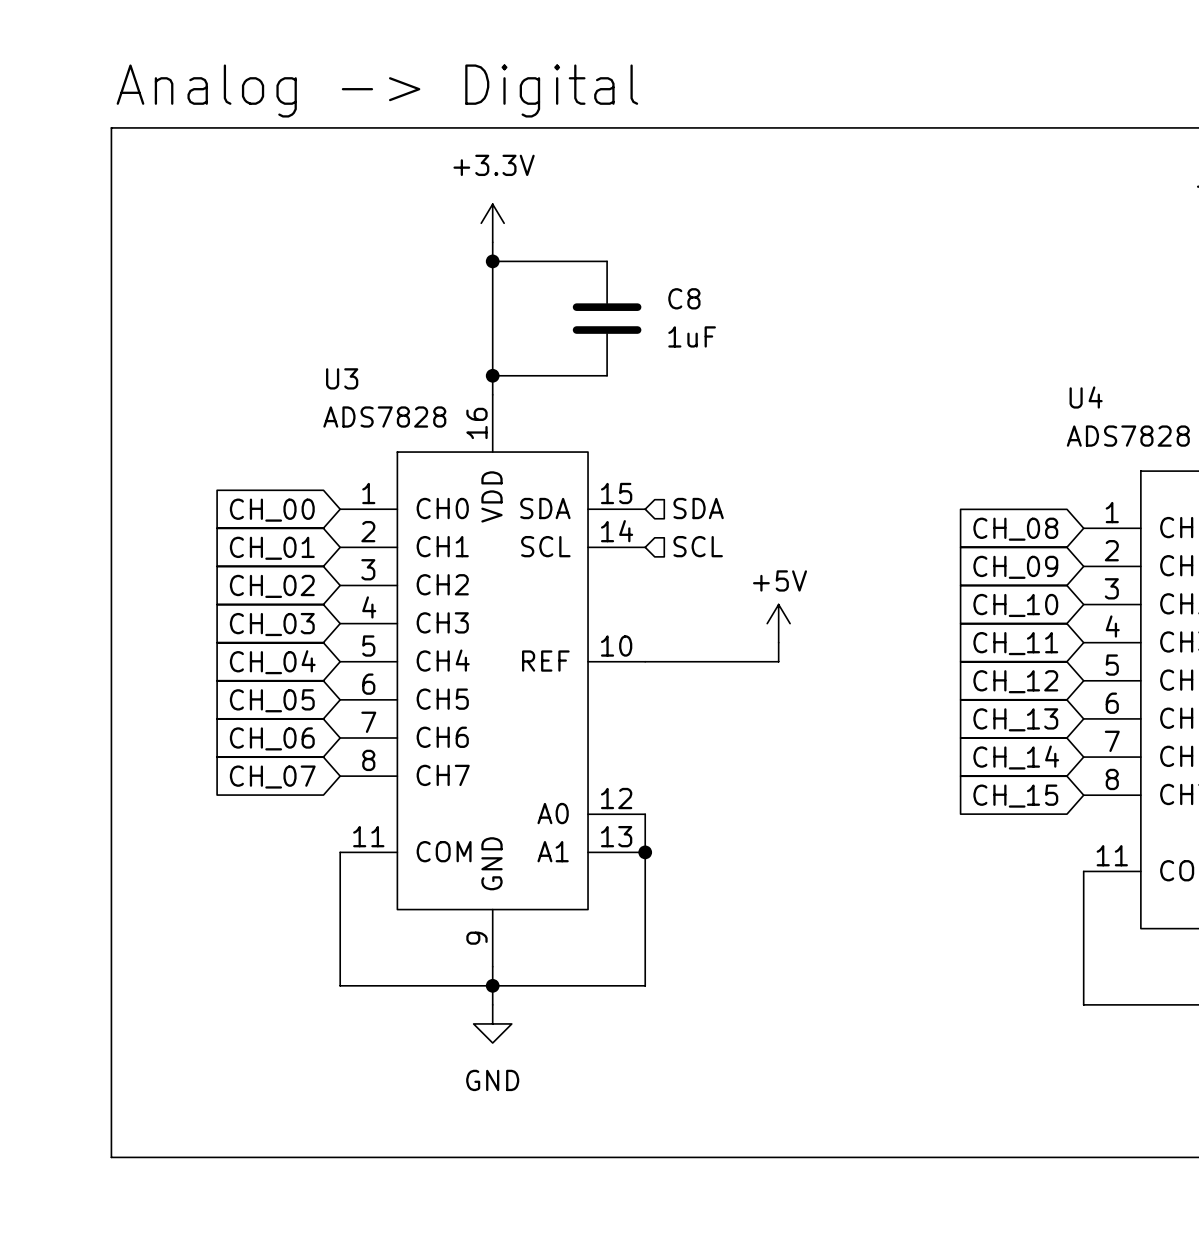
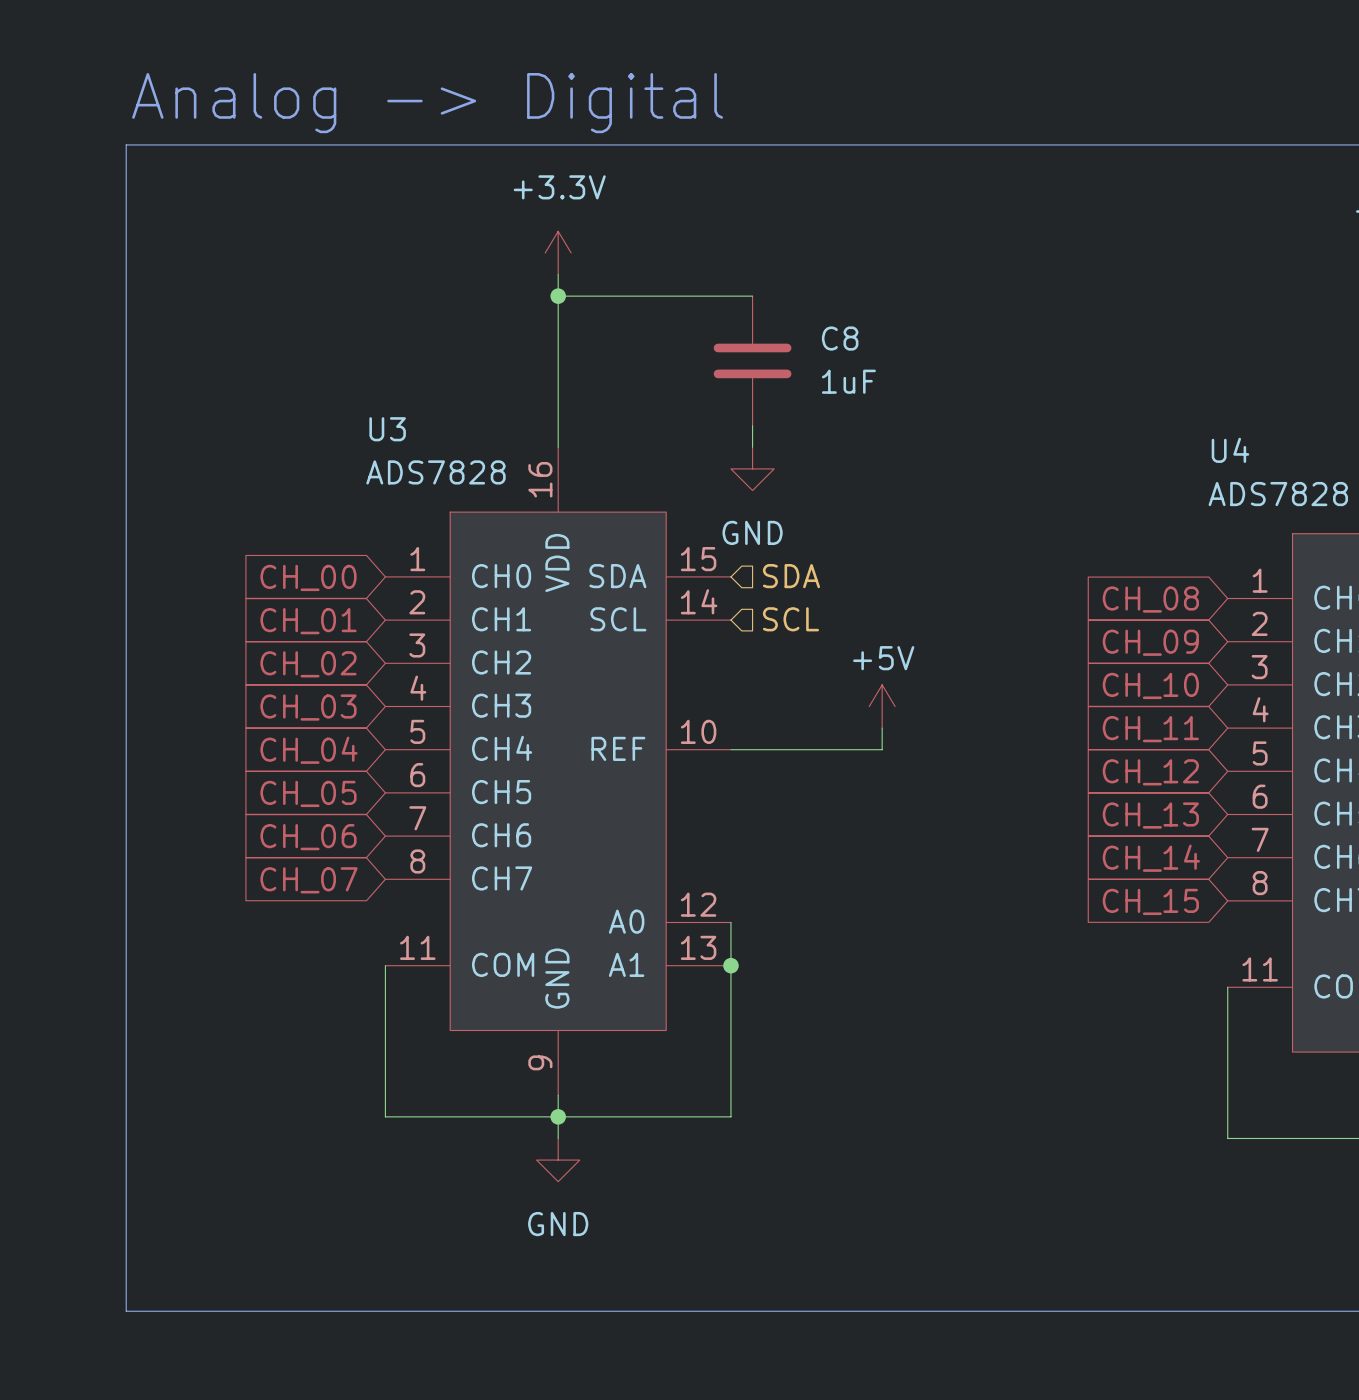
wire: none -> (687, 296) (752, 296)
C8 position: (607, 318) -> (752, 360)
wire: (492, 375) (607, 375) -> none
junction: (492, 375) -> none
wire: none -> (752, 425) (752, 447)
power symbol: none -> GND (752, 468)

